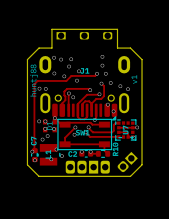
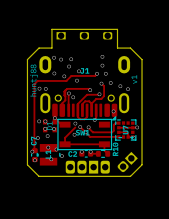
via: (107, 104) -> none
via: none -> (75, 123)
track: (65, 124) (66, 122) (104, 124) -> none
via: (75, 127) -> none
track: none -> (80, 127) (85, 132)
via: none -> (80, 127)
via: none -> (37, 138)
via: (42, 139) -> none
via: none -> (48, 147)

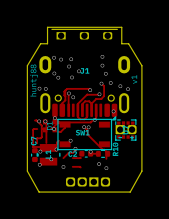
board edge: none -> (47, 27) (47, 43) (40, 43) (27, 65) (27, 171) (39, 192) (130, 192) (141, 171) (141, 65) (128, 43) (121, 43) (121, 27) (47, 27)
board edge: (51, 29) (51, 48) (39, 48) (27, 59) (27, 164) (39, 176) -> none
board edge: (117, 29) (117, 48) (130, 48) (142, 59) (142, 164) (130, 176) (38, 176) -> none
track: (97, 73) (94, 75) (71, 75) (66, 80) (37, 80) (34, 84) (34, 148) (32, 151) -> none
via: (97, 73) -> none
via: (64, 76) -> none
via: none -> (58, 77)
via: none -> (72, 77)
via: (76, 80) -> none
track: none -> (34, 120) (41, 125) (41, 137) (37, 138) (37, 142)
track: none -> (45, 120) (46, 143)
track: none -> (92, 121) (58, 122) (50, 129)
via: (75, 123) -> none
track: (118, 123) (113, 124) (112, 132) (92, 132) (88, 127) -> none
track: none -> (65, 127) (59, 131)
track: (75, 127) (65, 137) (65, 144) (104, 144) (104, 150) (107, 153) -> none
track: (80, 127) (90, 136) (118, 136) -> none
via: (80, 127) -> none
track: none -> (84, 127) (87, 130) (87, 134) (106, 151) (106, 158)
via: none -> (84, 127)
track: (137, 127) (118, 127) -> none
via: (137, 127) -> none
via: (45, 128) -> none
track: none -> (37, 129) (33, 129) (33, 147) (54, 147) (58, 140)
part: none -> (120, 129)
part: none -> (132, 129)
via: (85, 132) -> none
track: (118, 132) (126, 132) (128, 137) (132, 137) -> none
via: (74, 134) -> none
via: (47, 136) -> none
via: (133, 137) -> none
via: (37, 138) -> none
via: none -> (70, 140)
via: (48, 147) -> none
track: none -> (75, 148) (72, 152) (68, 152) (63, 158)
via: none -> (75, 148)
via: (32, 151) -> none
via: none -> (40, 151)
via: (81, 151) -> none
via: (61, 156) -> none
track: none -> (80, 157) (72, 158)
part: (131, 158) -> none
via: (34, 160) -> none
via: none -> (39, 164)
via: none -> (99, 164)
via: none -> (63, 166)
track: none -> (72, 166) (80, 167)
part: (123, 166) -> none
part: (87, 167) -> none
via: none -> (106, 168)
part: none -> (88, 181)

